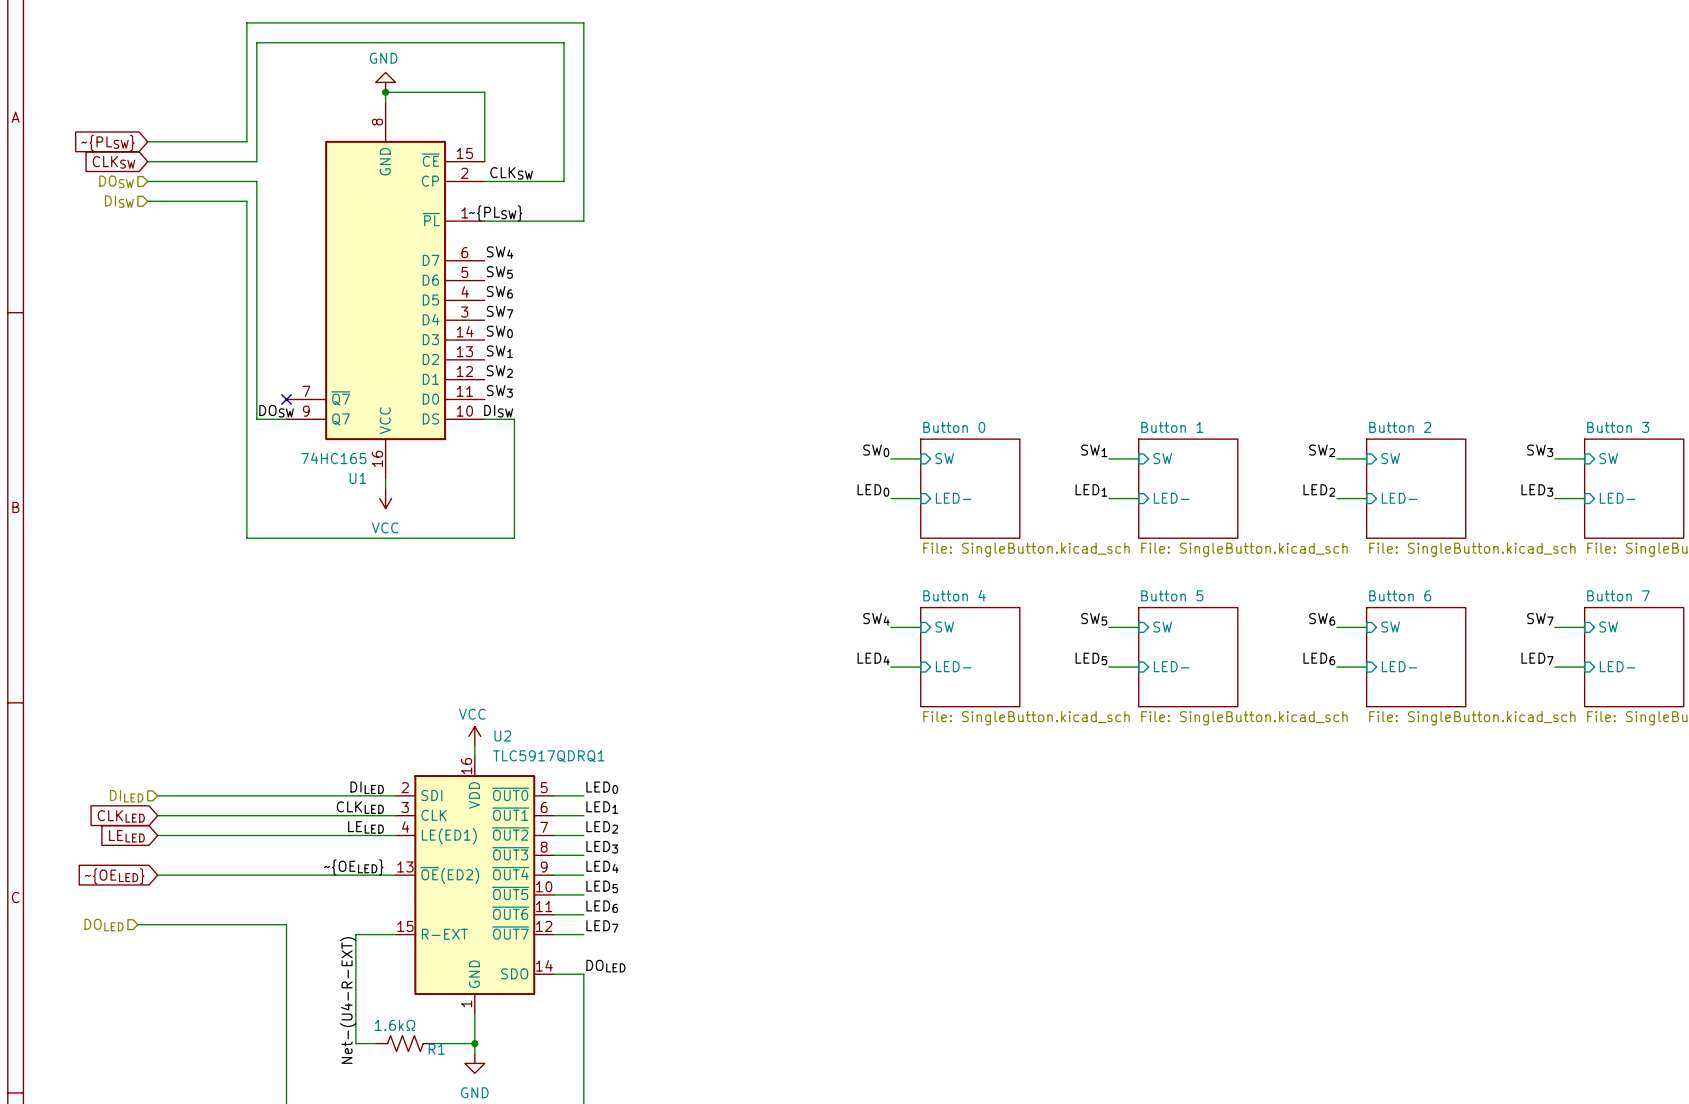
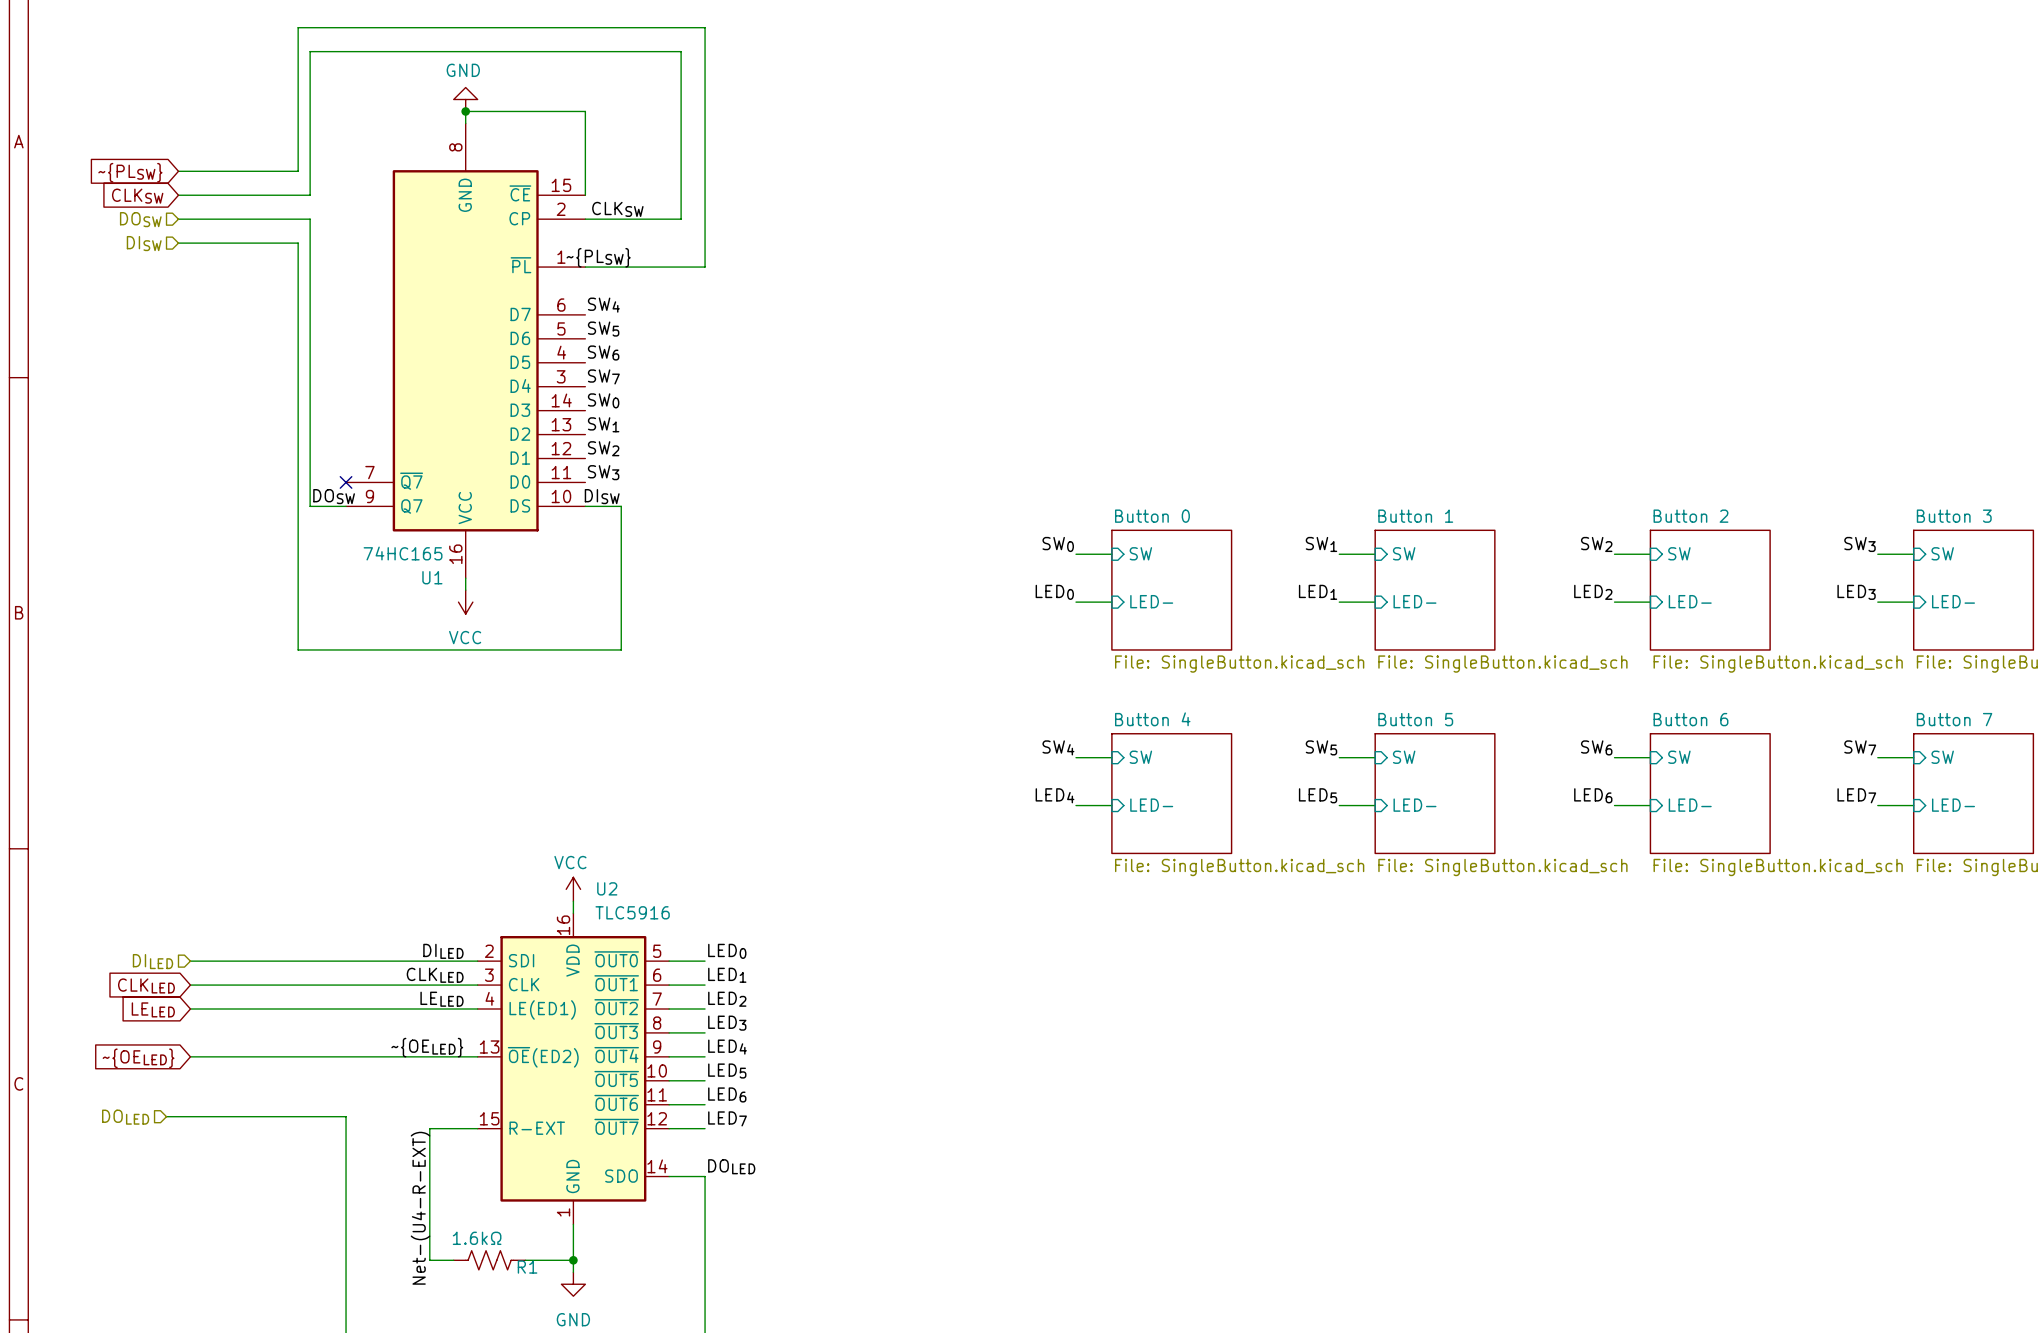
U2 value: TLC5917QDRQ1 (548, 756) -> TLC5916 (632, 912)

